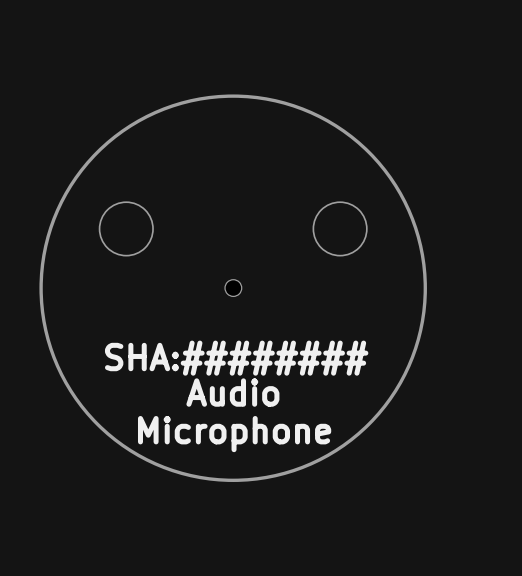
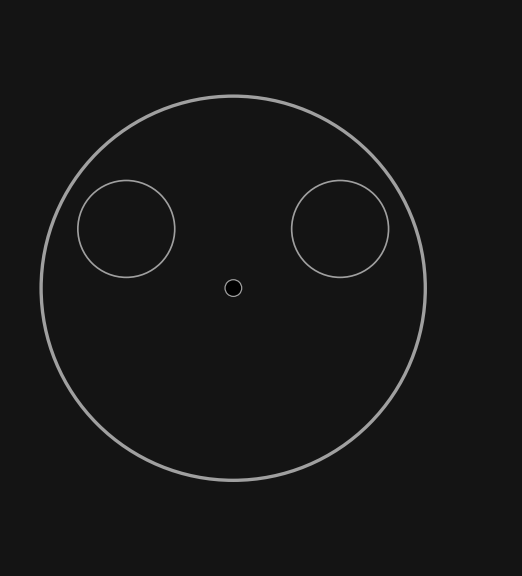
round board edge size: [98, 201, 154, 257] -> [77, 179, 176, 279]
round board edge size: [312, 201, 368, 257] -> [290, 179, 390, 279]
text: SHA:######## (236, 358) -> none
text: Audio (232, 392) -> none
text: Microphone (234, 434) -> none

